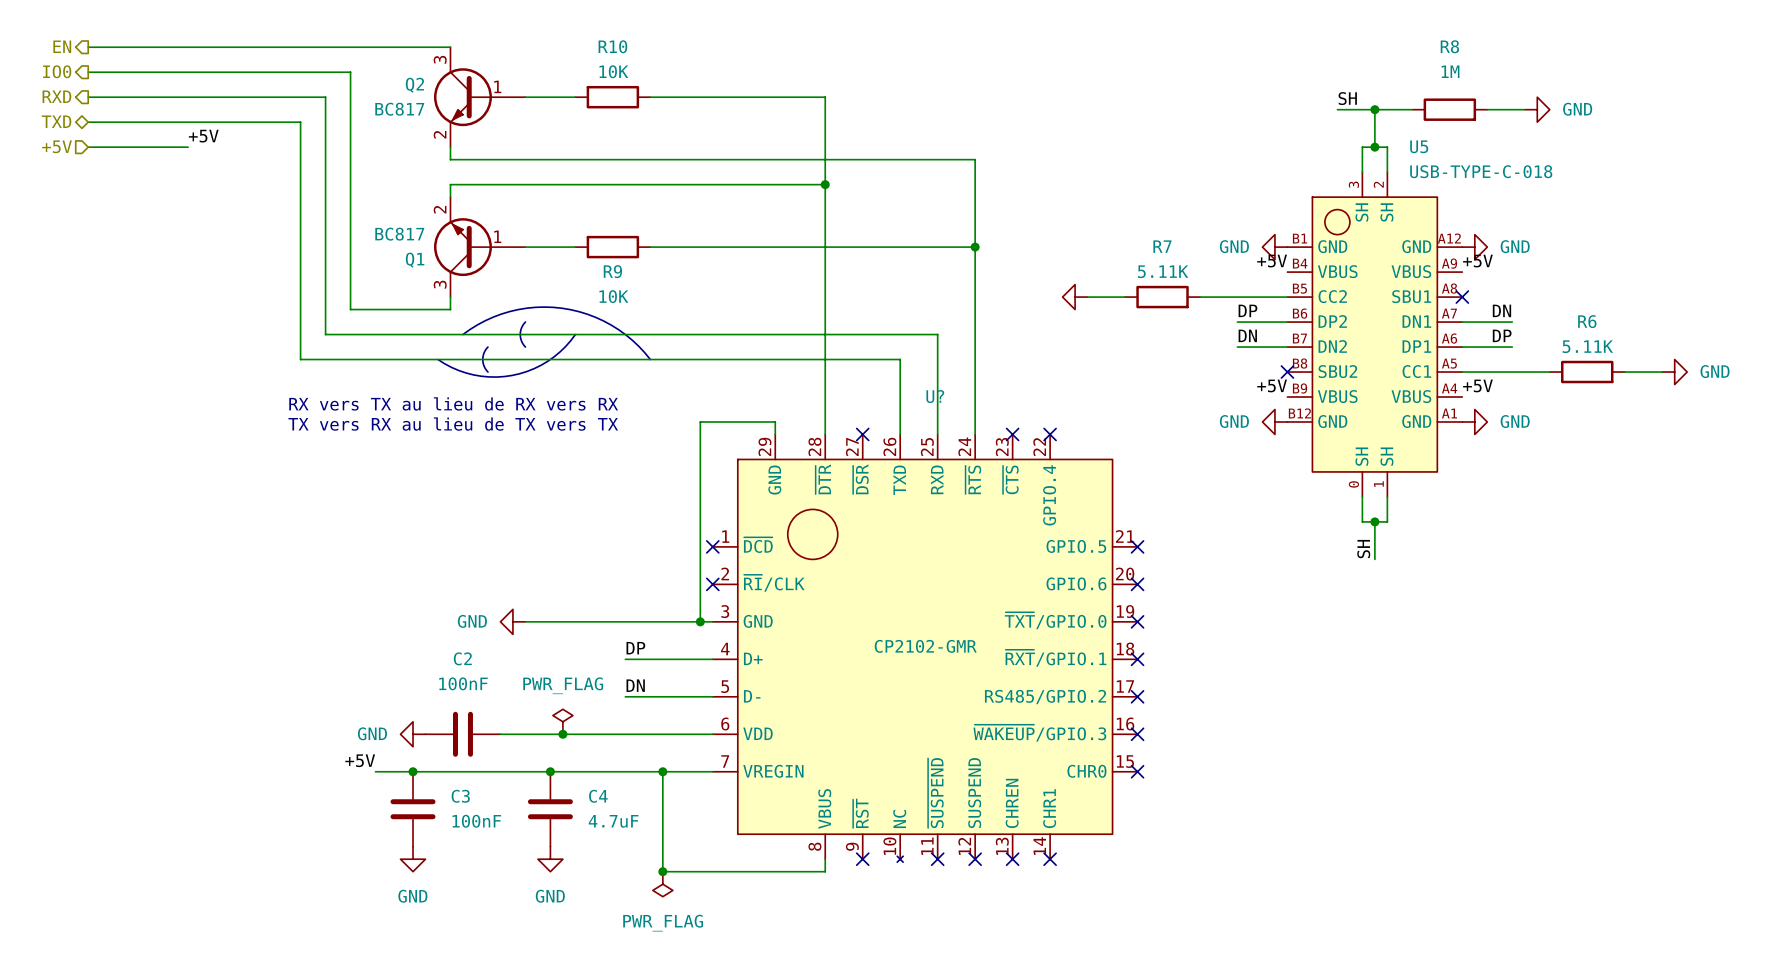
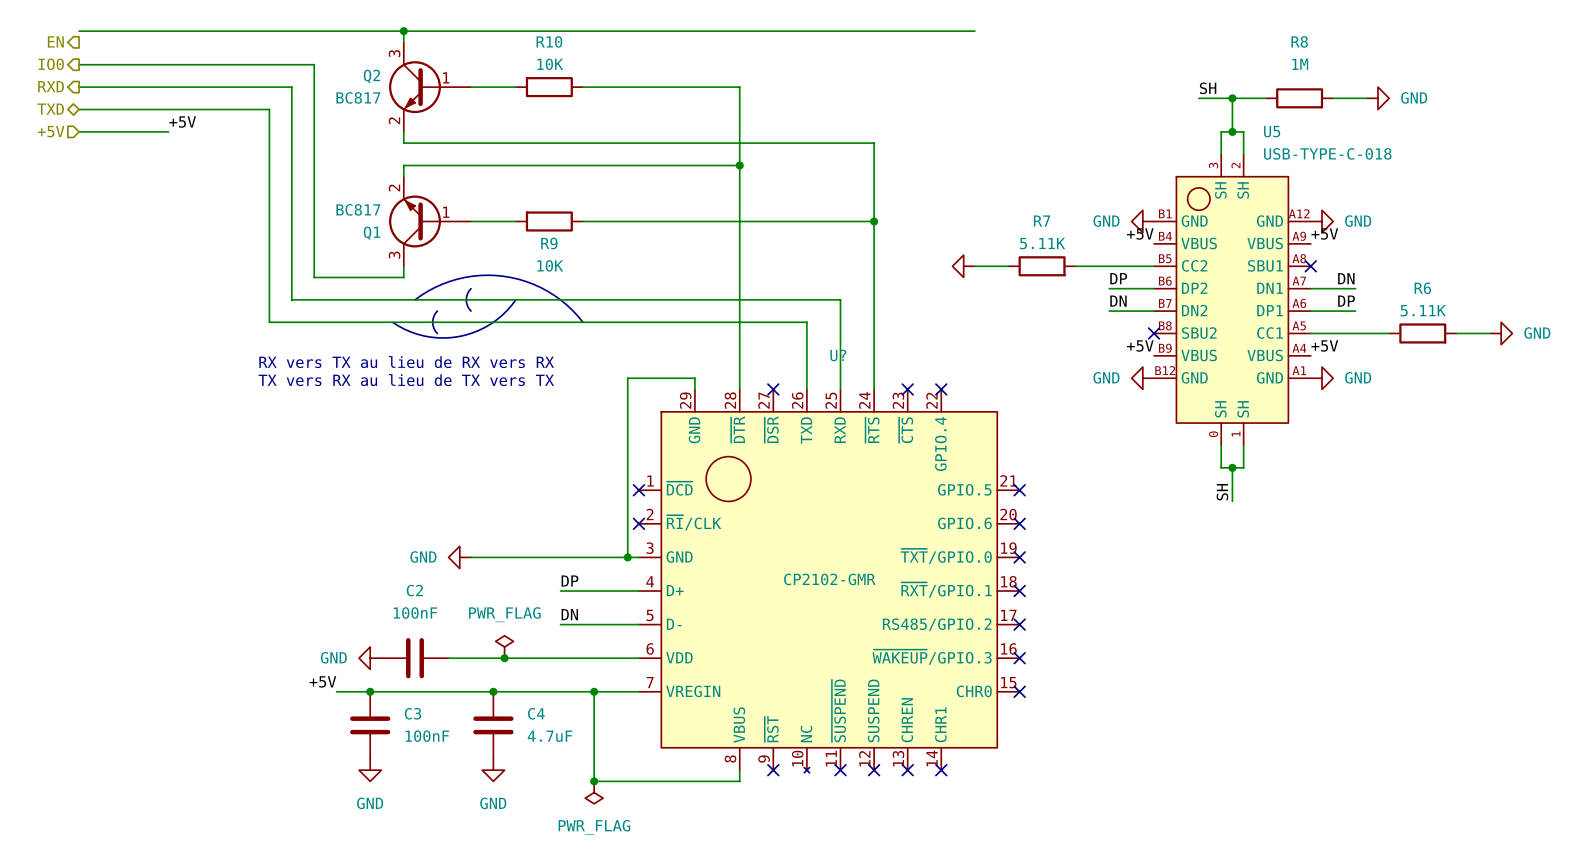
wire: none -> (79, 31) (974, 31)
junction: none -> (403, 31)
wire: (88, 47) (450, 47) -> (403, 31) (403, 42)

